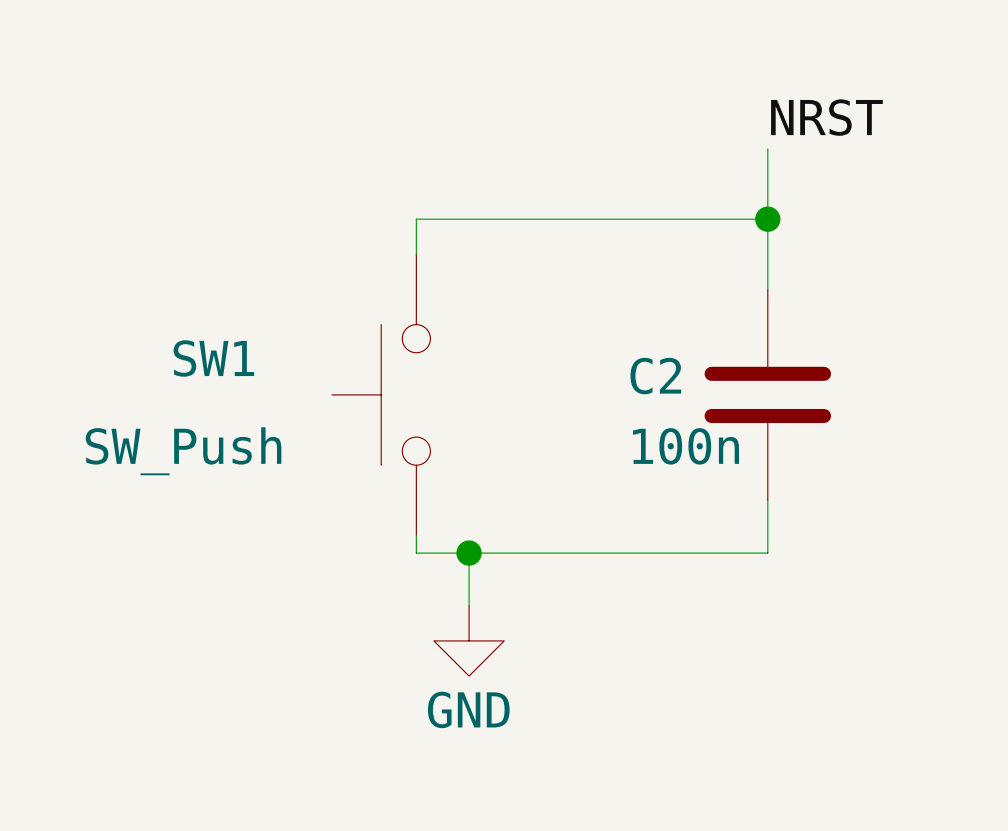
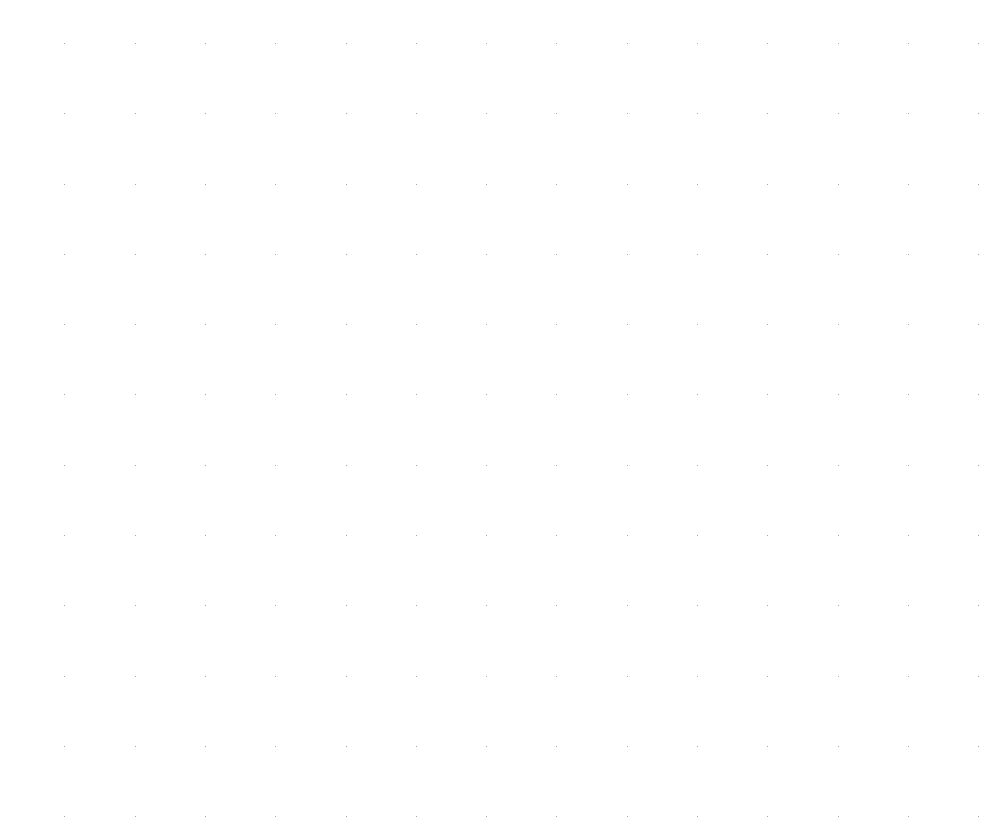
label: NRST (826, 117) -> none
wire: (767, 148) (767, 289) -> none
wire: (767, 219) (416, 219) (416, 254) -> none
junction: (767, 219) -> none
SW1: SW_Push (381, 394) -> none
C2: 100n (767, 394) -> none
wire: (767, 500) (767, 553) (416, 553) (416, 535) -> none
wire: (469, 553) (469, 605) -> none
junction: (469, 553) -> none
power symbol: GND (469, 640) -> none

